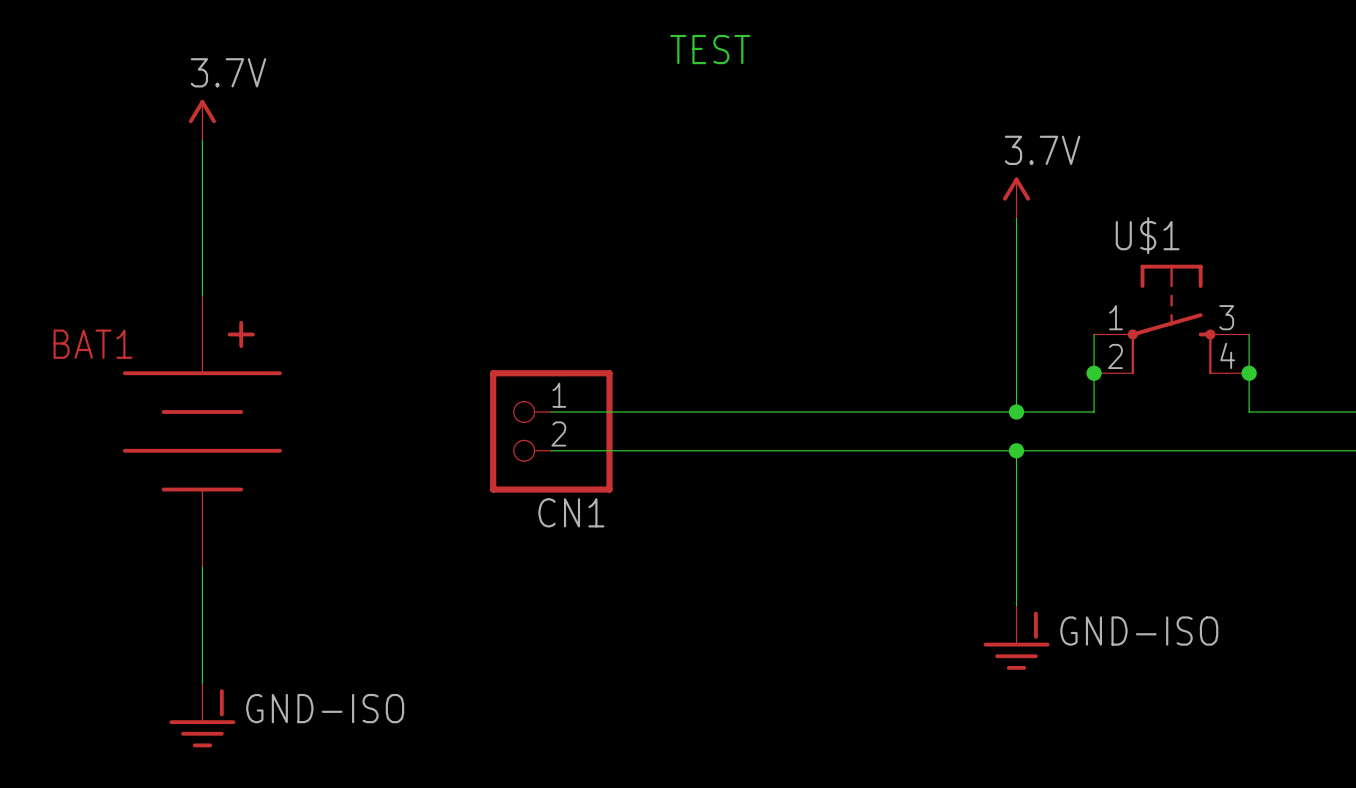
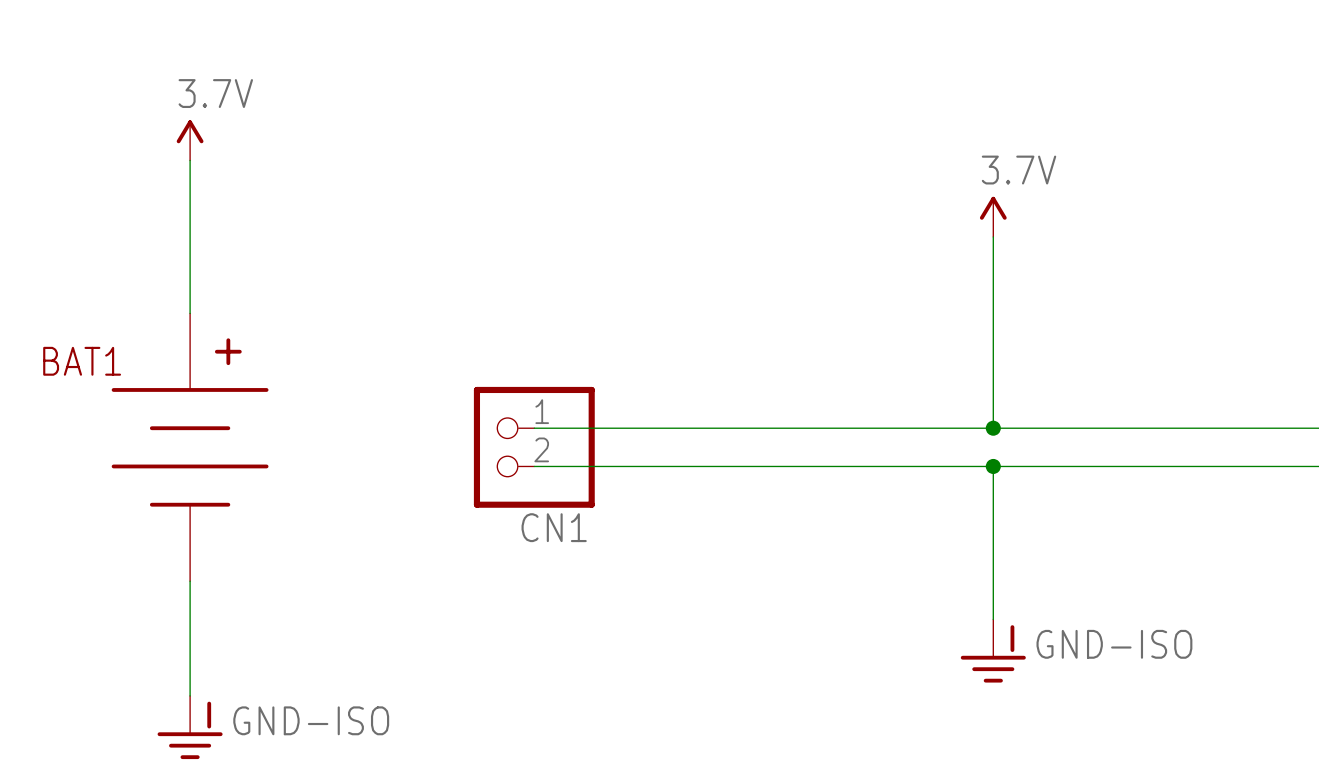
text: TEST (710, 49) -> none
U$1: (1171, 319) -> none
wire: (1094, 334) (1094, 412) -> (1222, 428) (1069, 428)
wire: (1249, 334) (1249, 412) -> none
junction: (1094, 373) -> none
junction: (1249, 373) -> none

